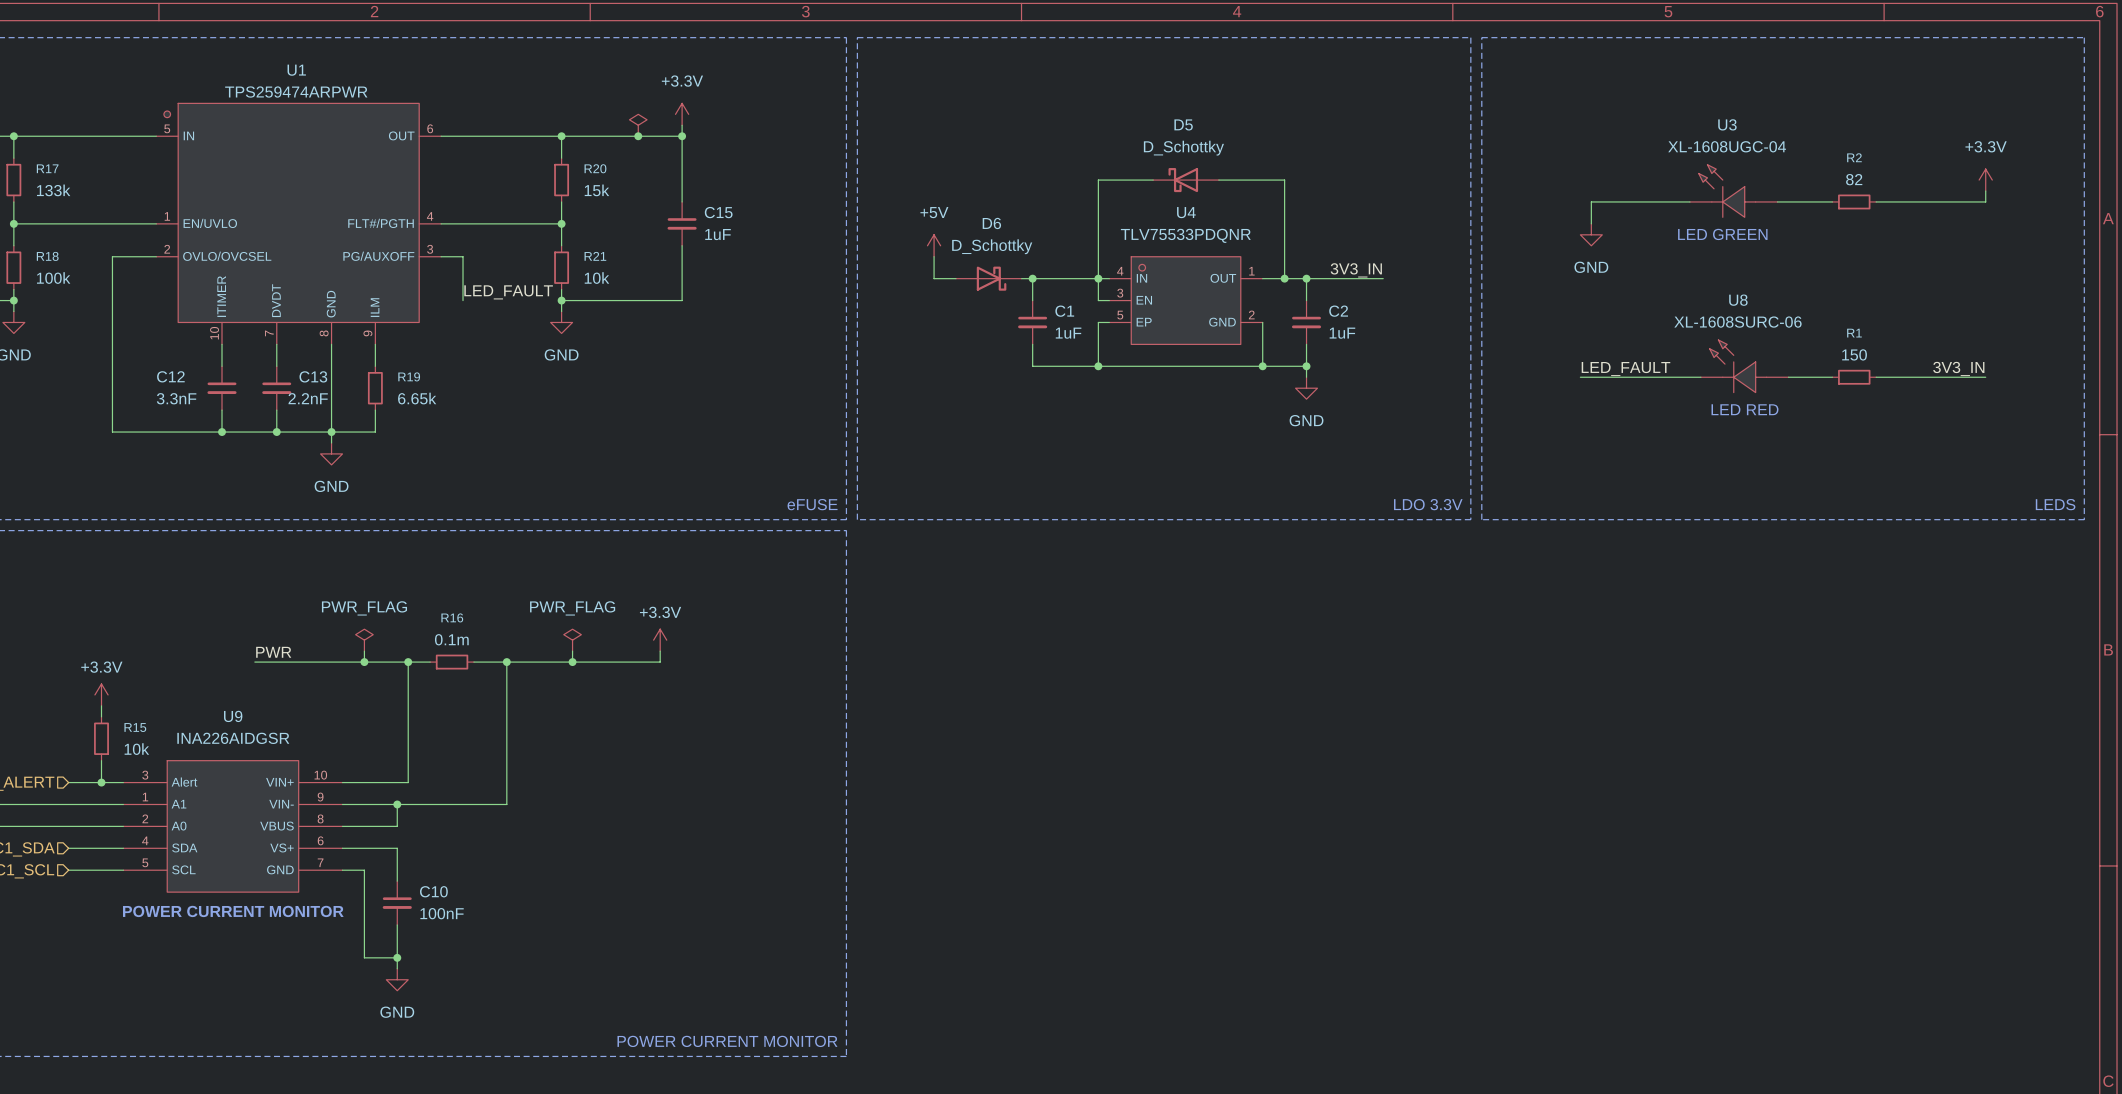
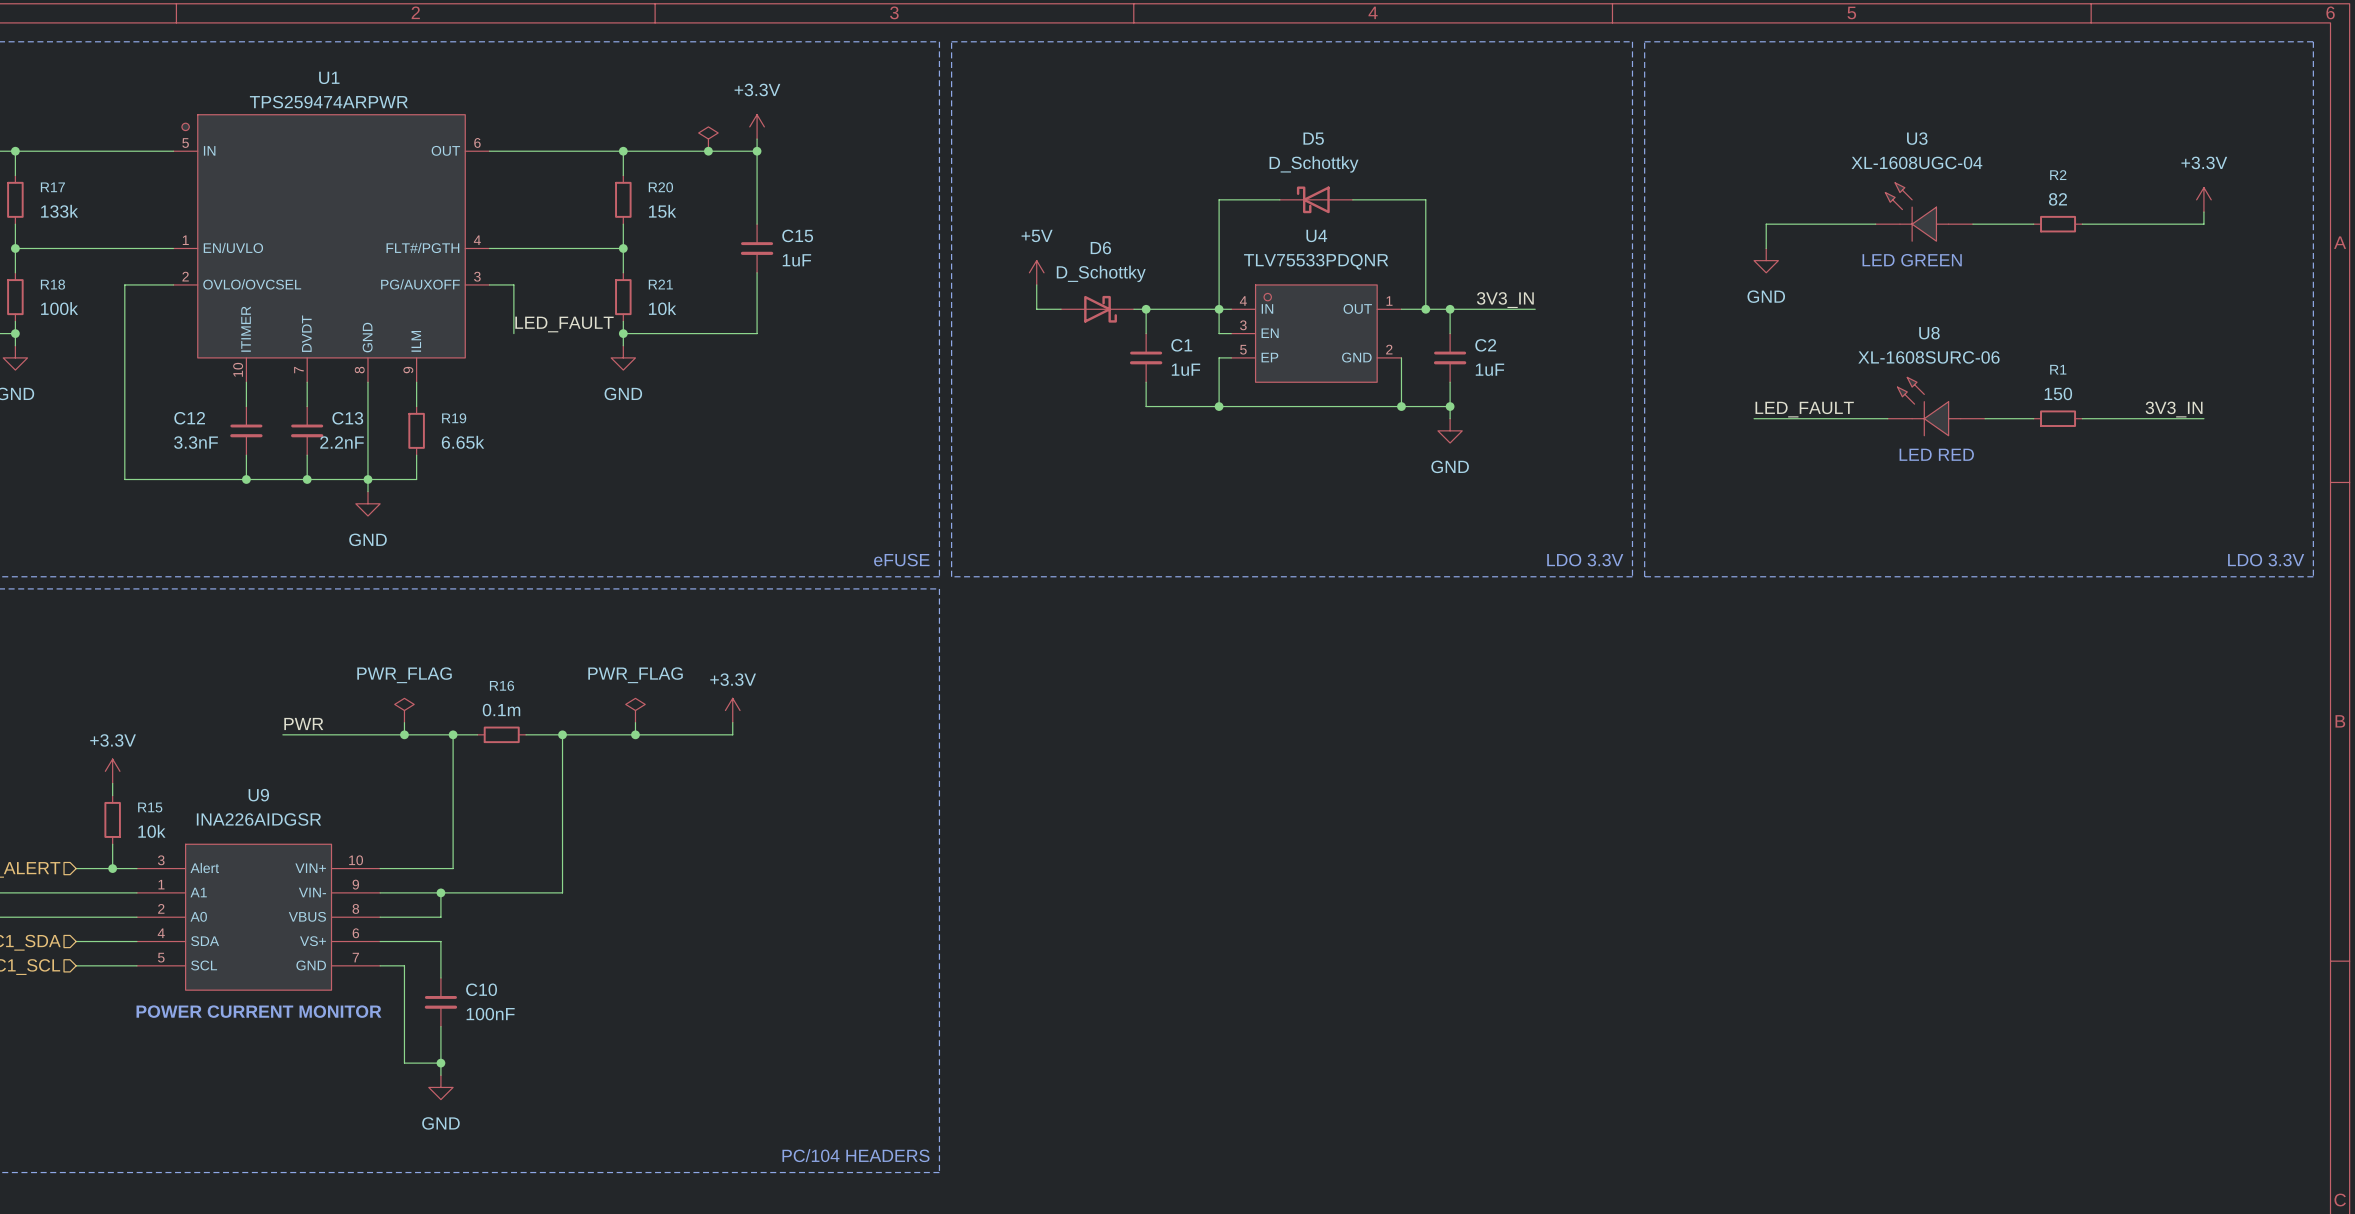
text: LEDS (2055, 504) -> LDO 3.3V (2266, 560)
text: POWER CURRENT MONITOR (727, 1041) -> PC/104 HEADERS (855, 1155)

